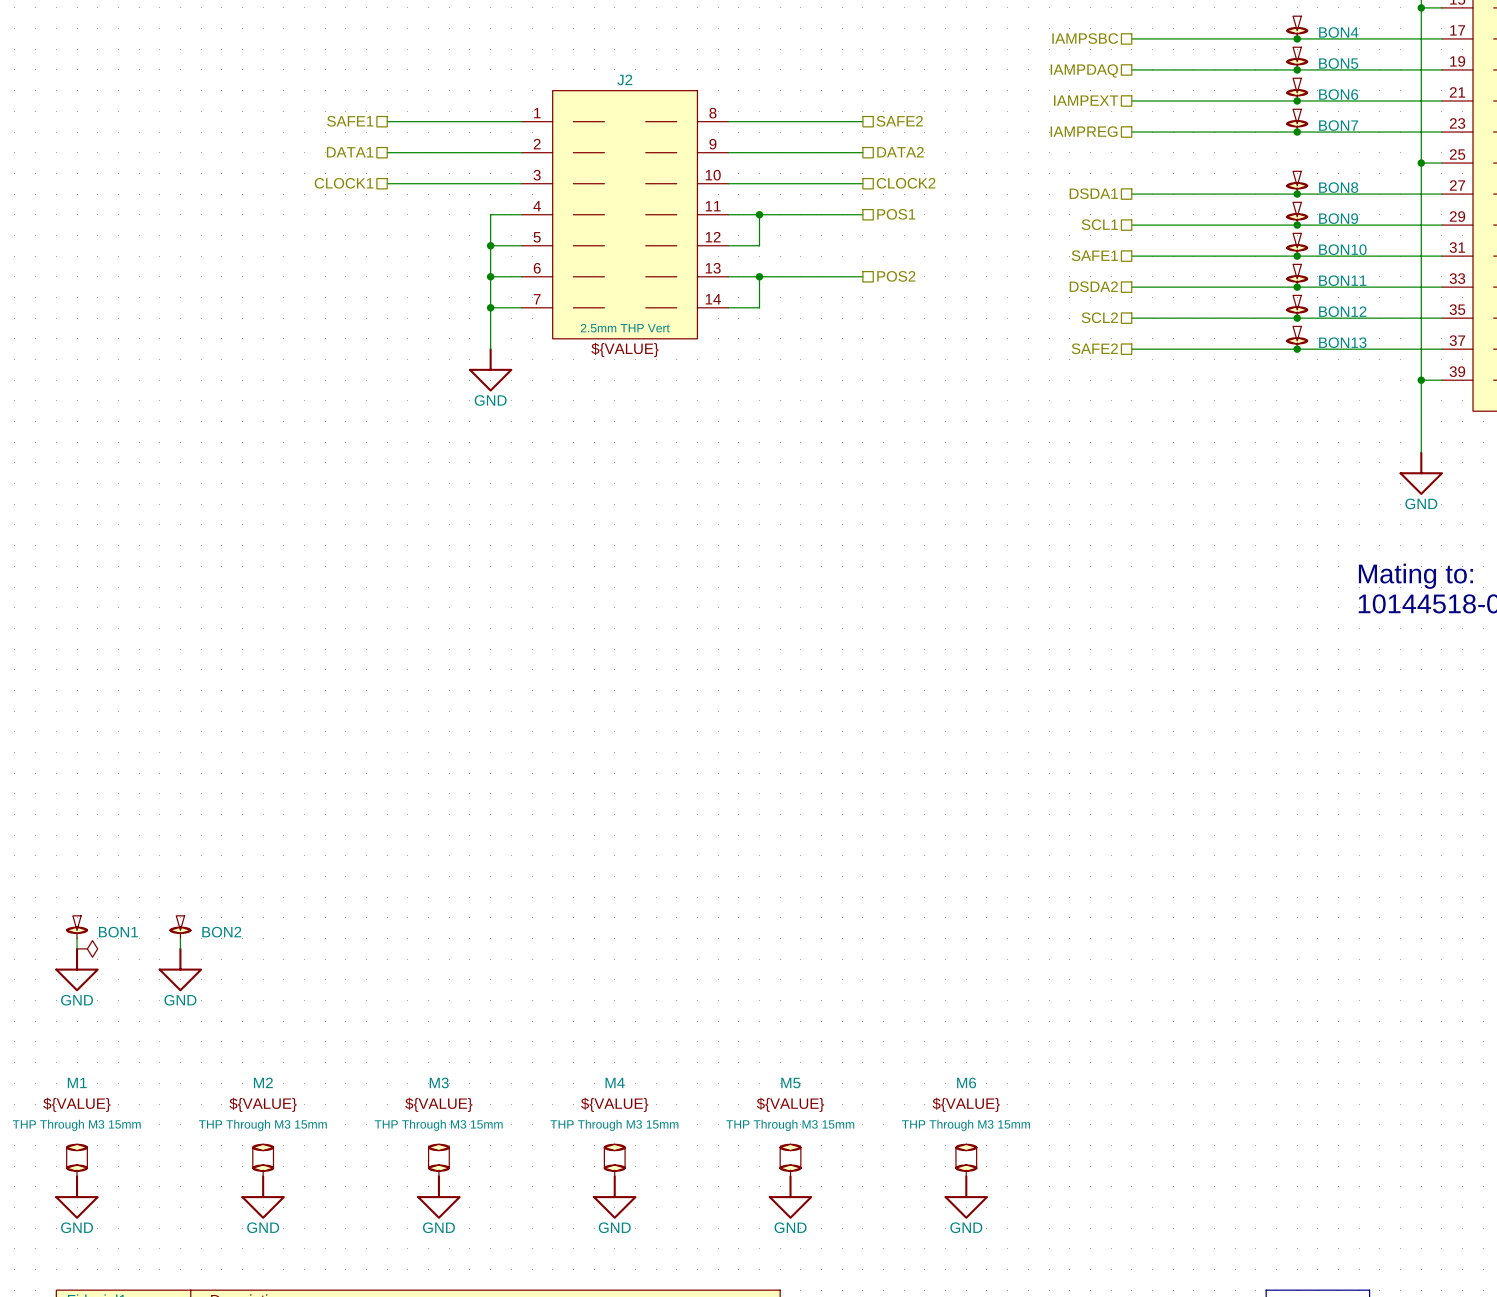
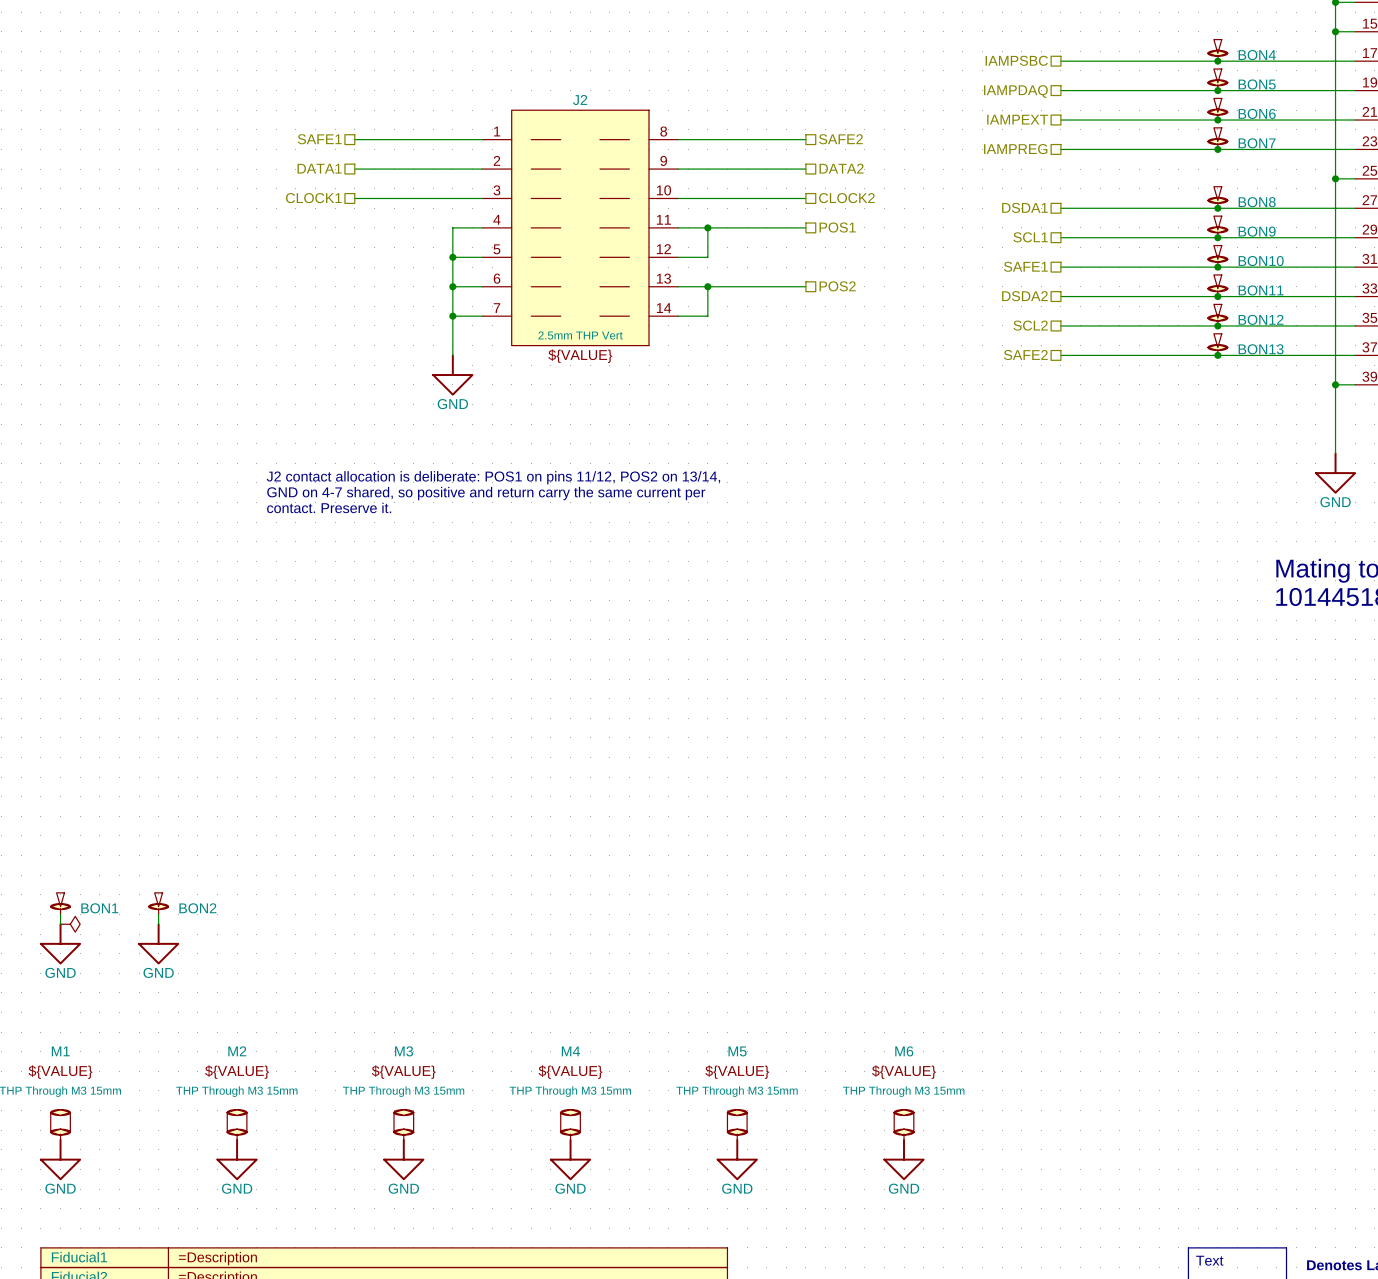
text: none -> J2 contact allocation is deliberate: POS1 on pins 11/12, POS2 on 13/14, (493, 477)
text: none -> GND on 4-7 shared, so positive and return carry the same current per (486, 493)
text: none -> contact. Preserve it. (329, 507)

